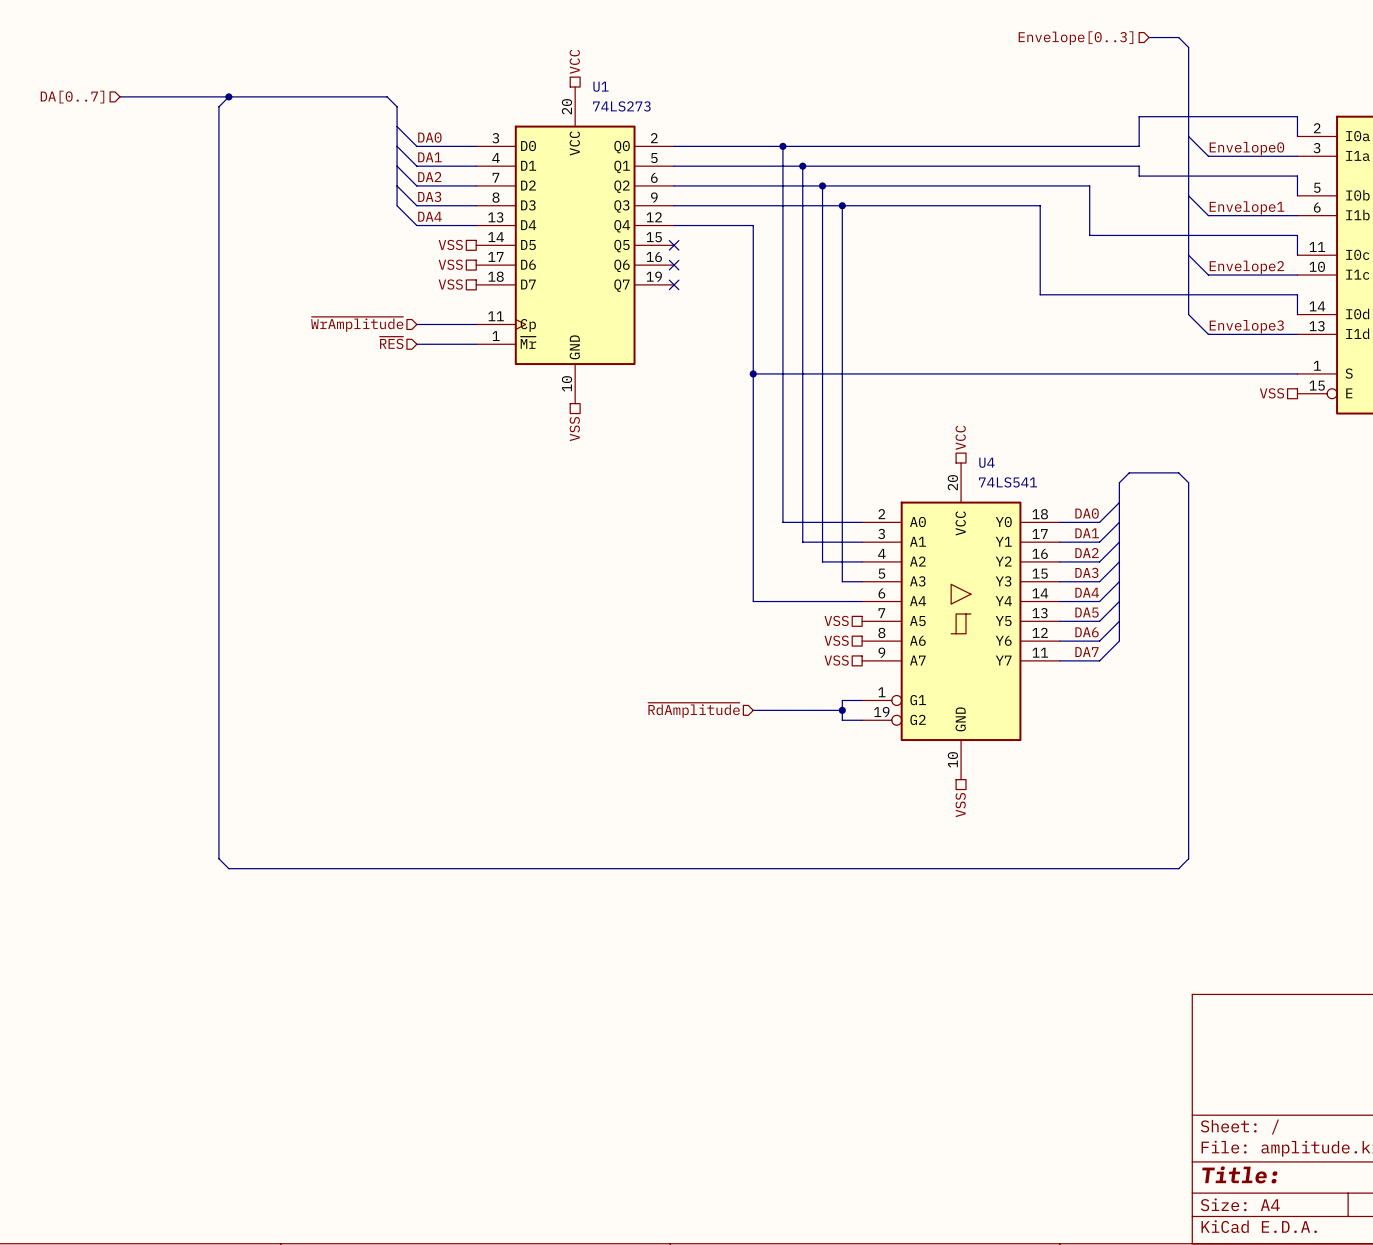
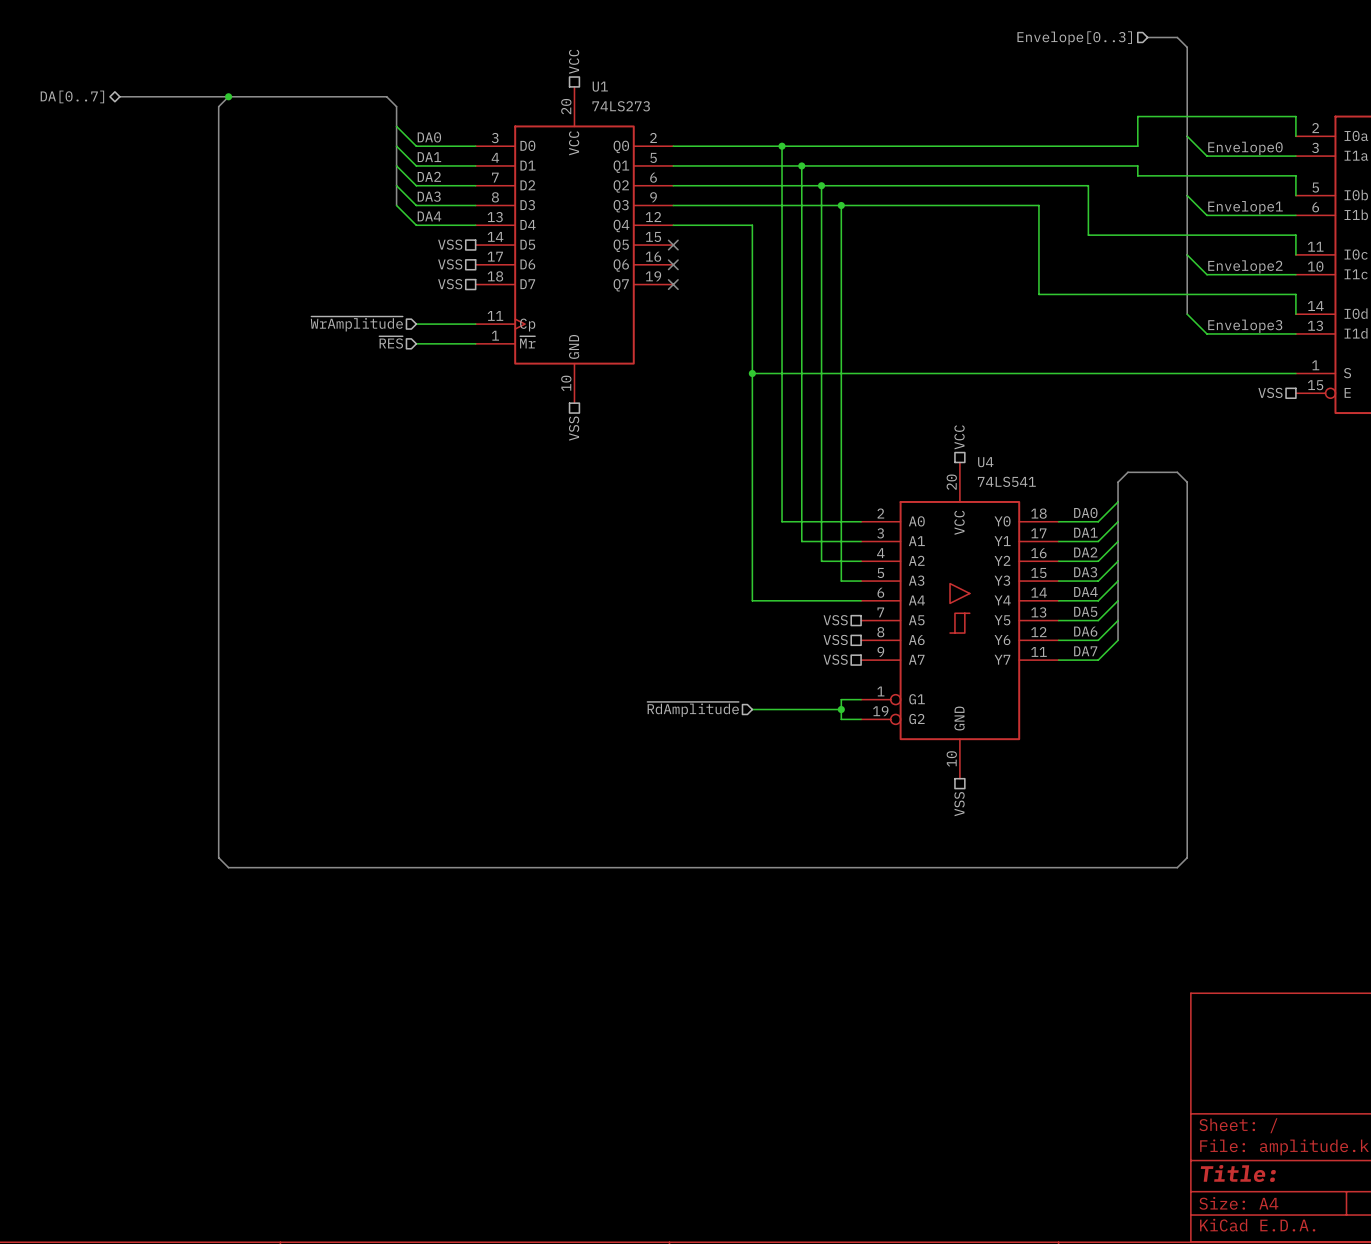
hierarchical label shape: input (72, 97) -> bidirectional (72, 96)

